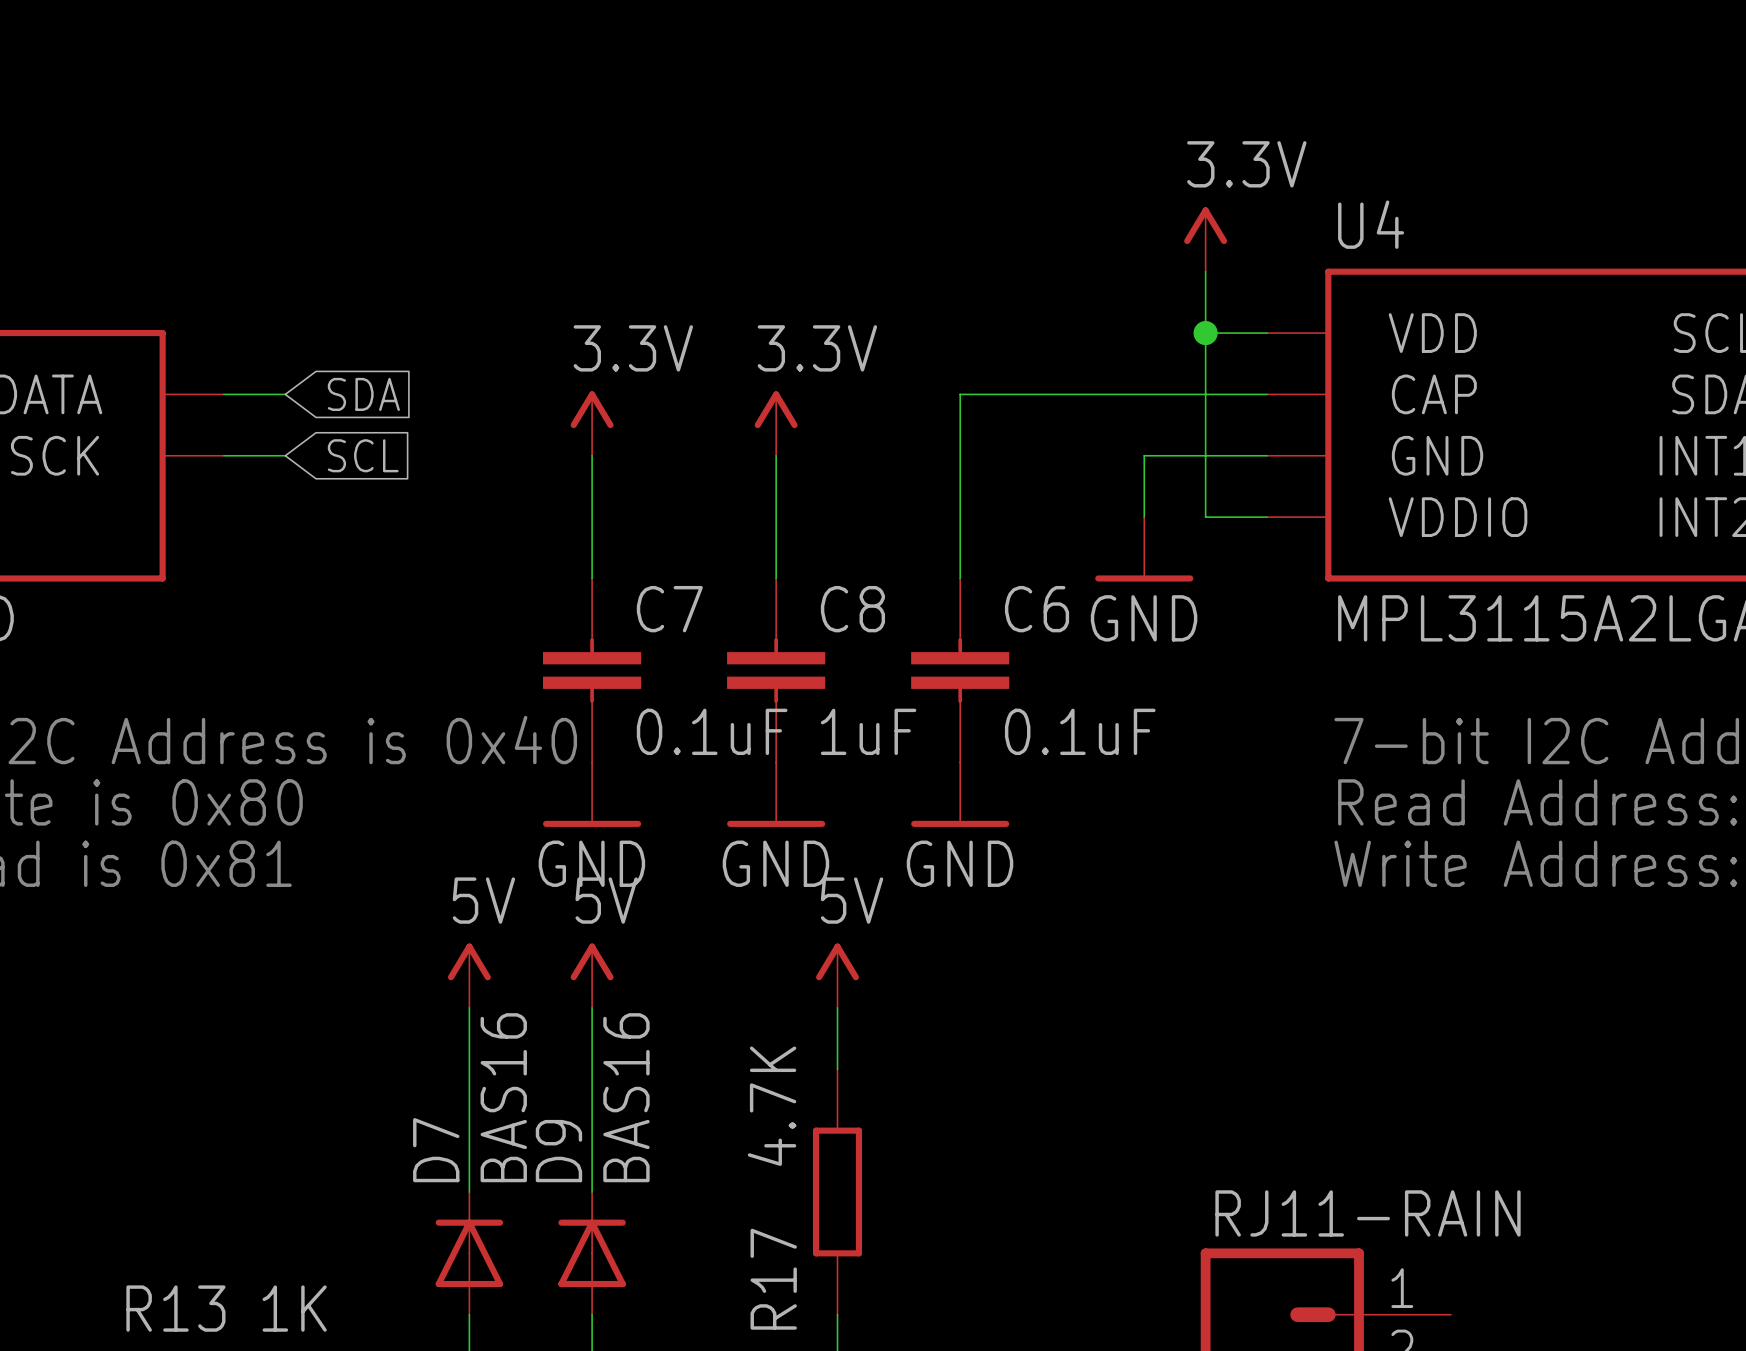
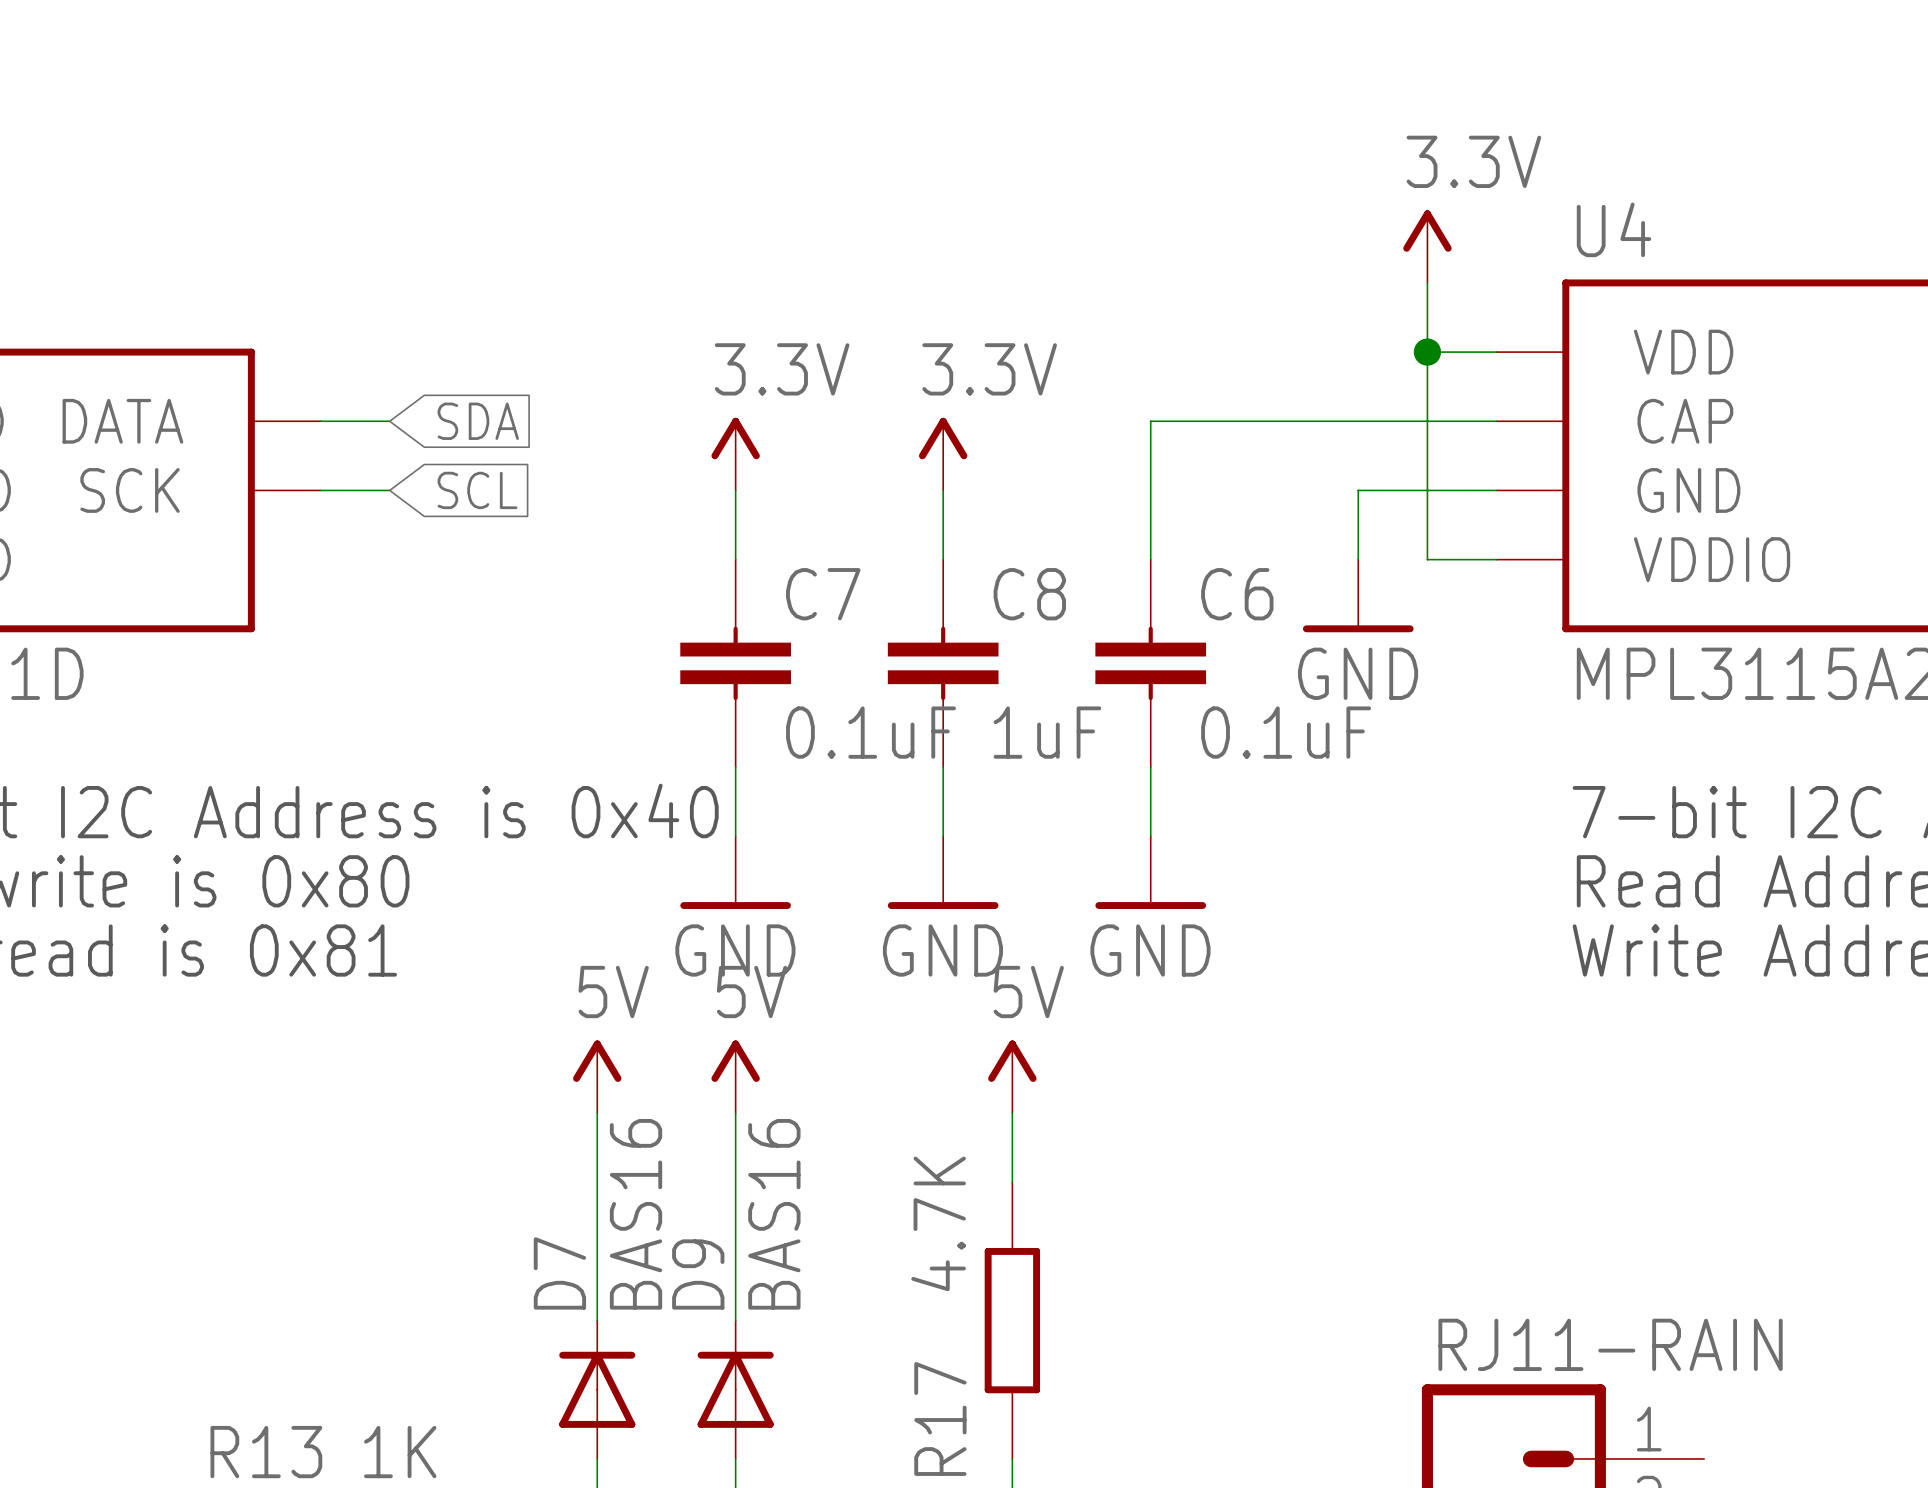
C7 position: (592, 670) -> (735, 663)
C8 position: (776, 670) -> (943, 663)
C6 position: (960, 670) -> (1150, 663)

